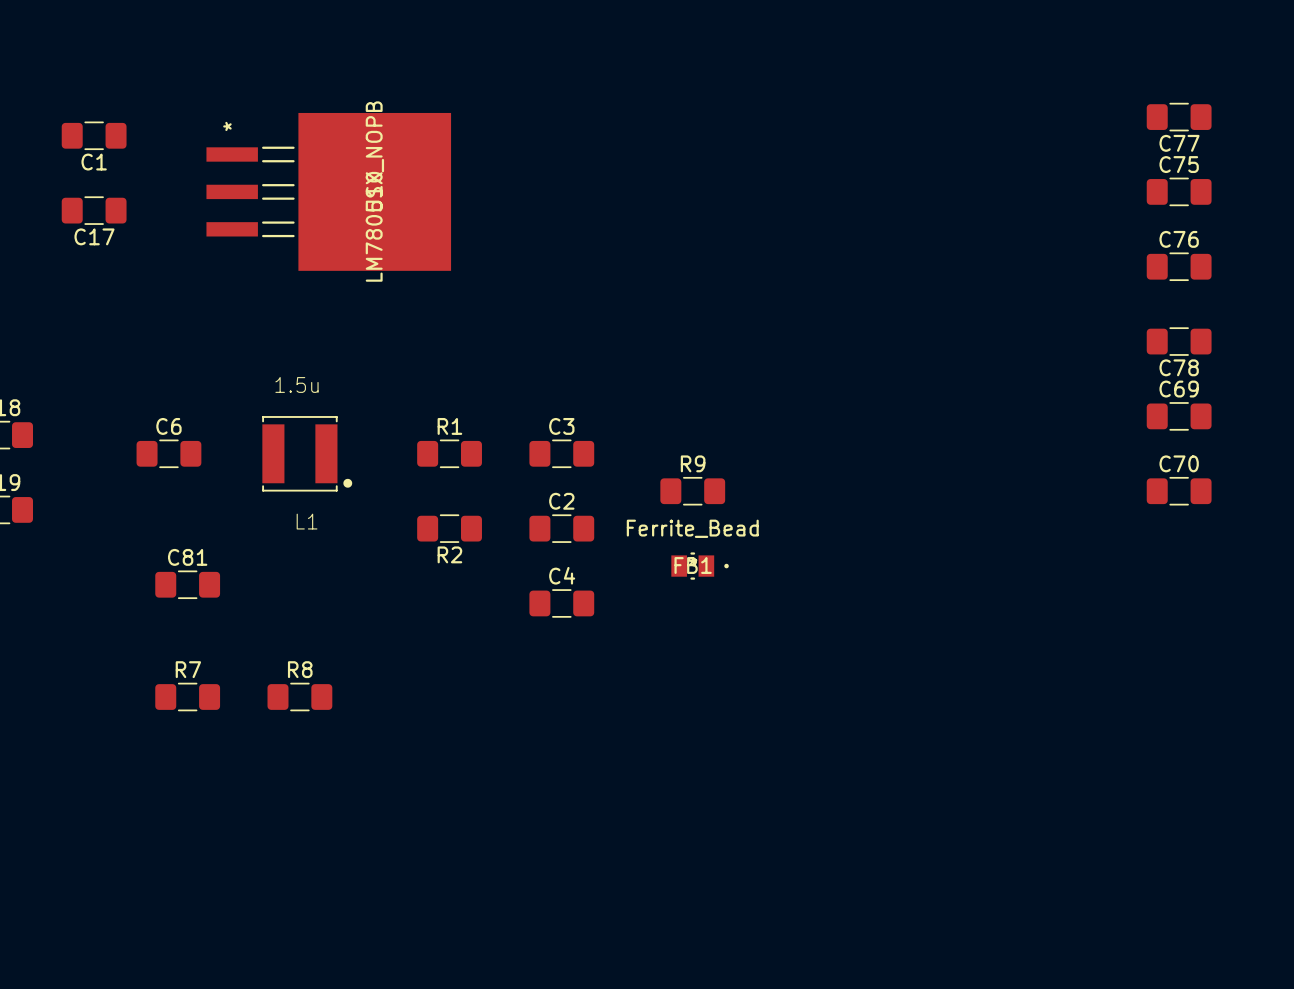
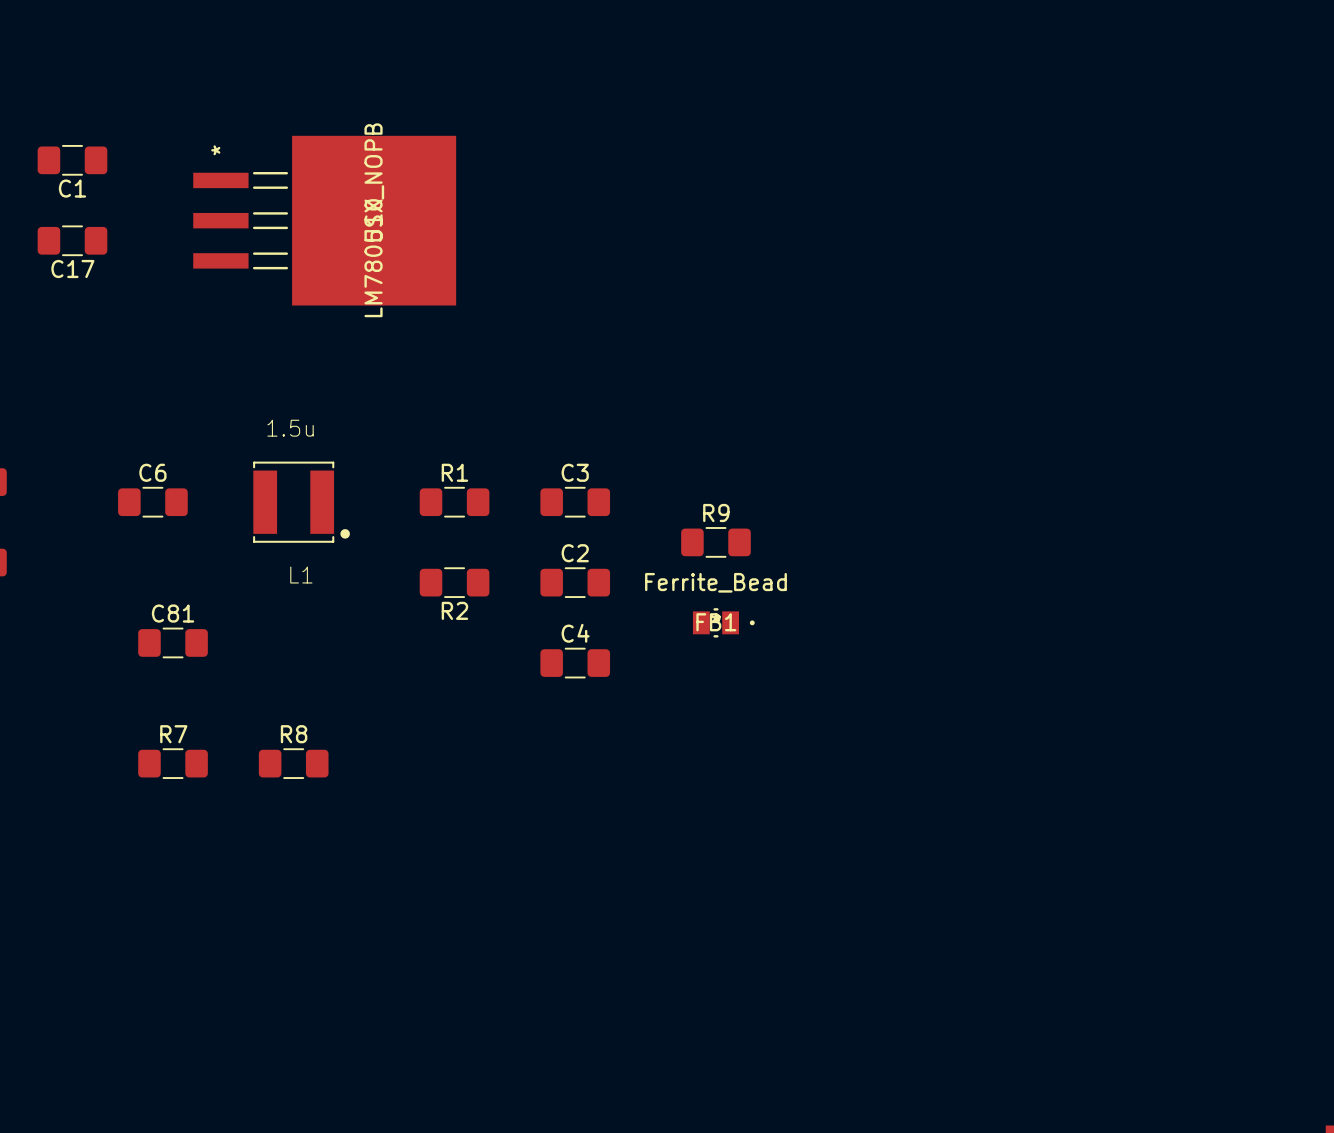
C77: (1179, 117) -> none
C75: (1179, 191) -> none
C76: (1179, 266) -> none
C78: (1179, 341) -> none
C69: (1179, 416) -> none
C70: (1179, 491) -> none

